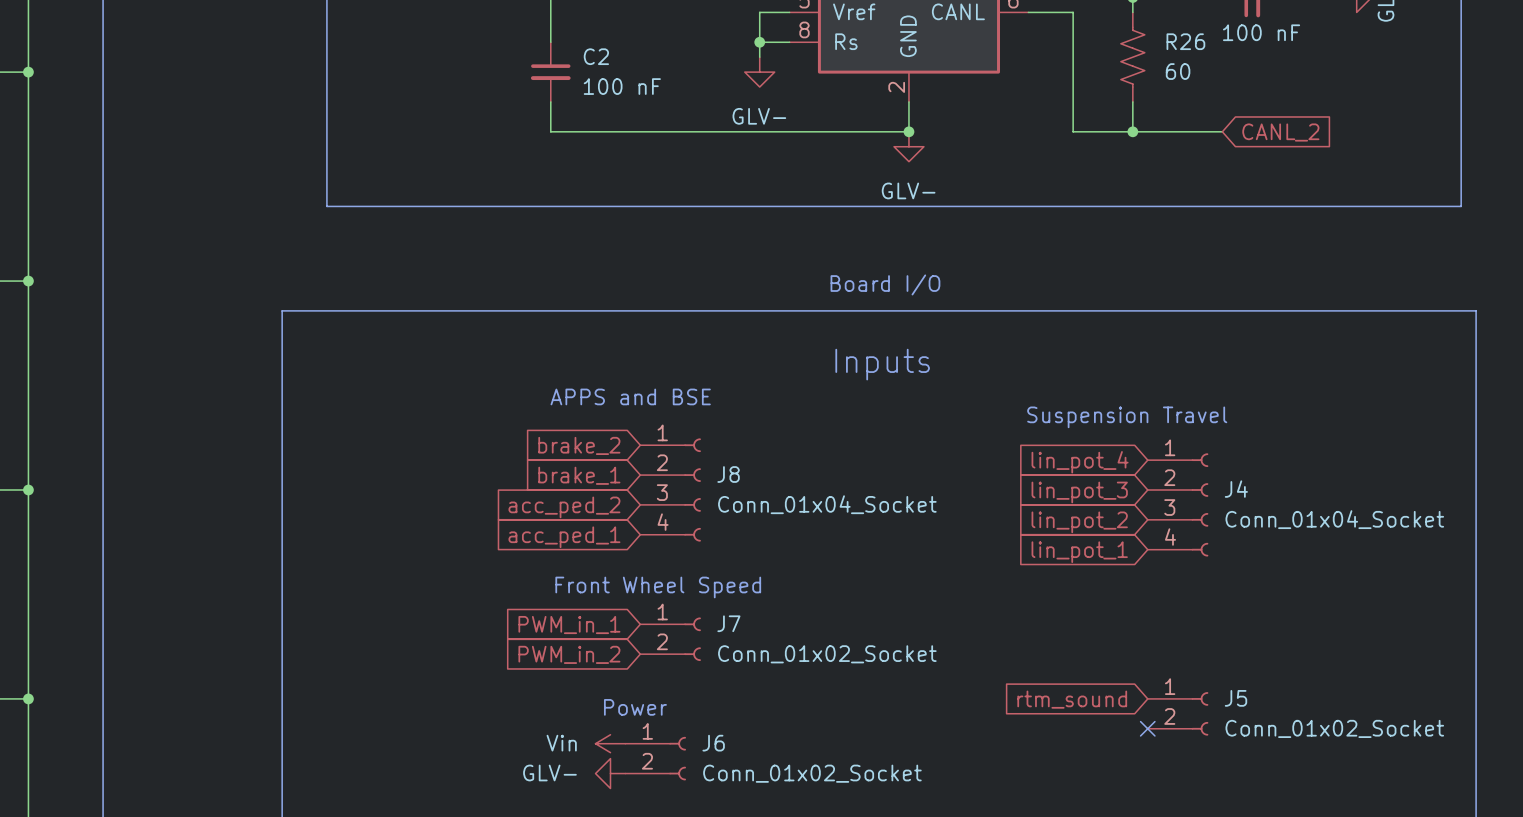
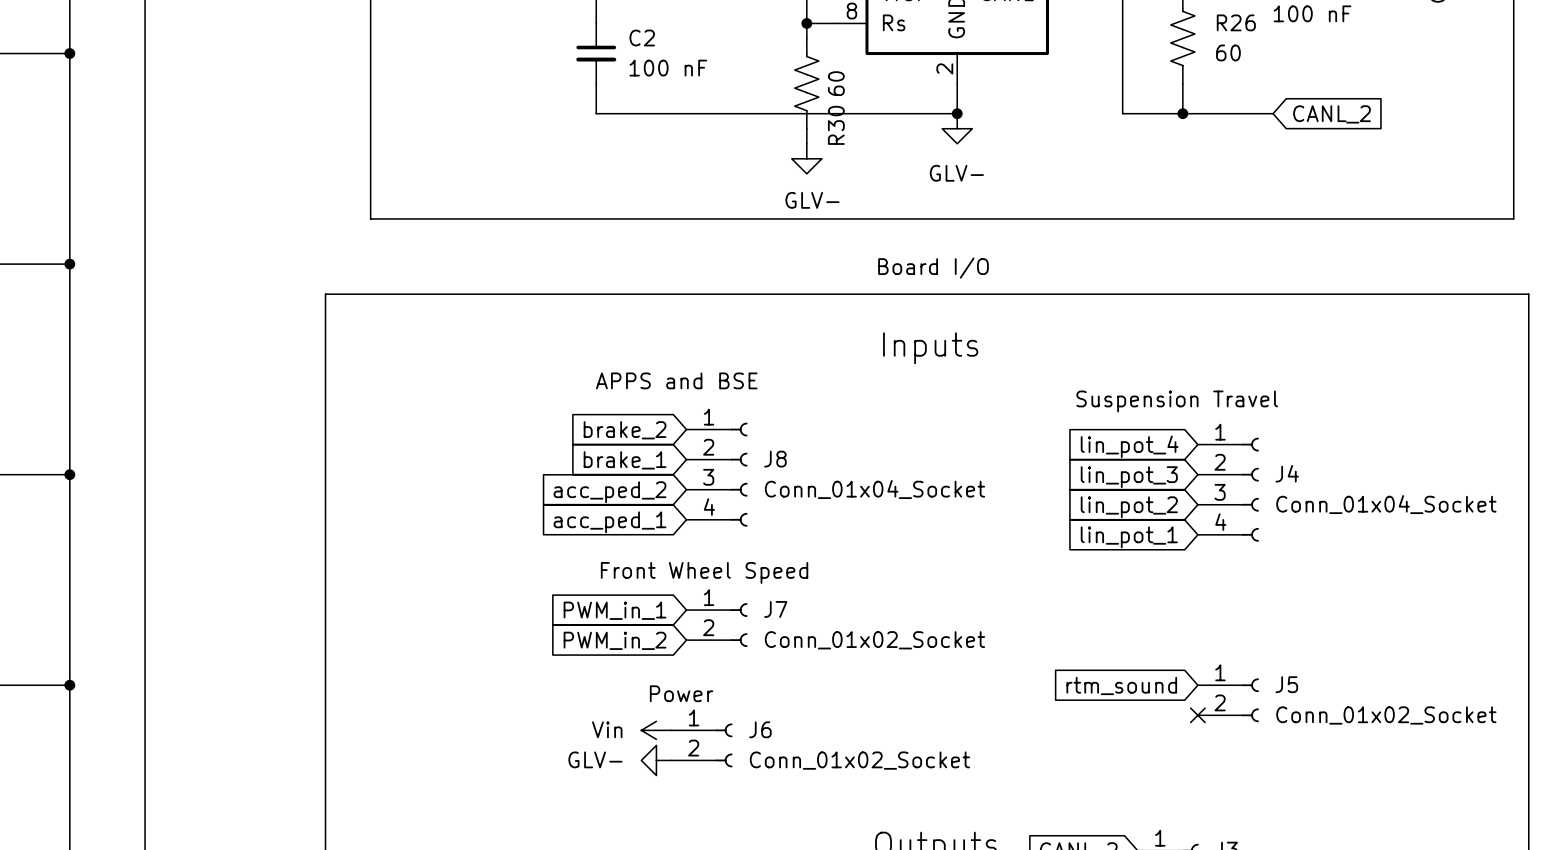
power symbol position: GLV- (759, 72) -> GLV- (806, 158)
R30: none -> 60 (806, 83)
power symbol text position: GLV- (759, 116) -> GLV- (812, 200)
wire: none -> (806, 128) (806, 143)
line: (326, 206) (1461, 206) -> (370, 188) (370, 218) (1513, 218) (1513, 188)

